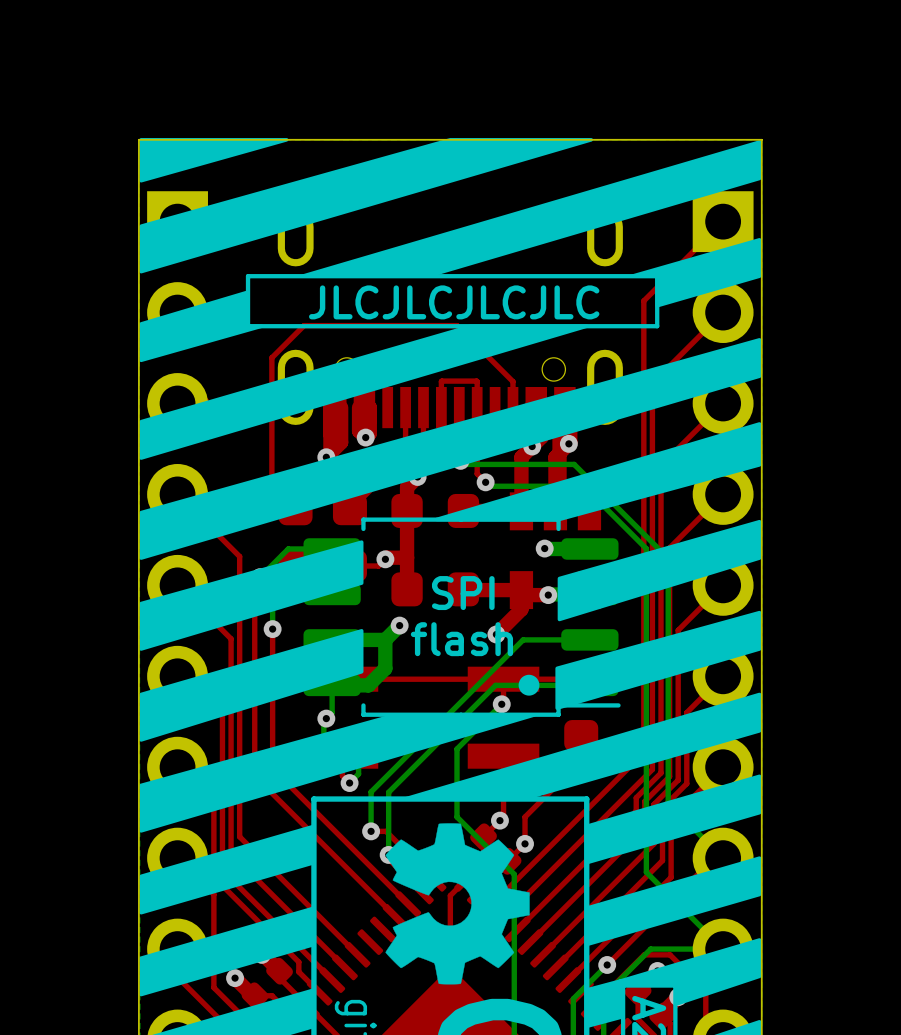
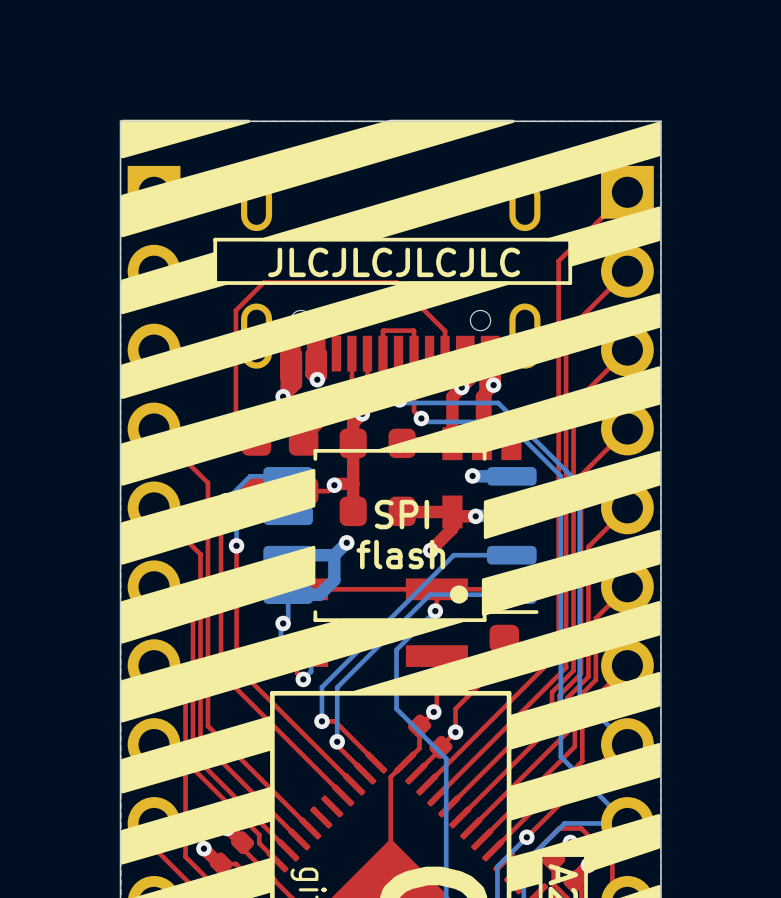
drawing: [385, 823, 530, 985] -> none

